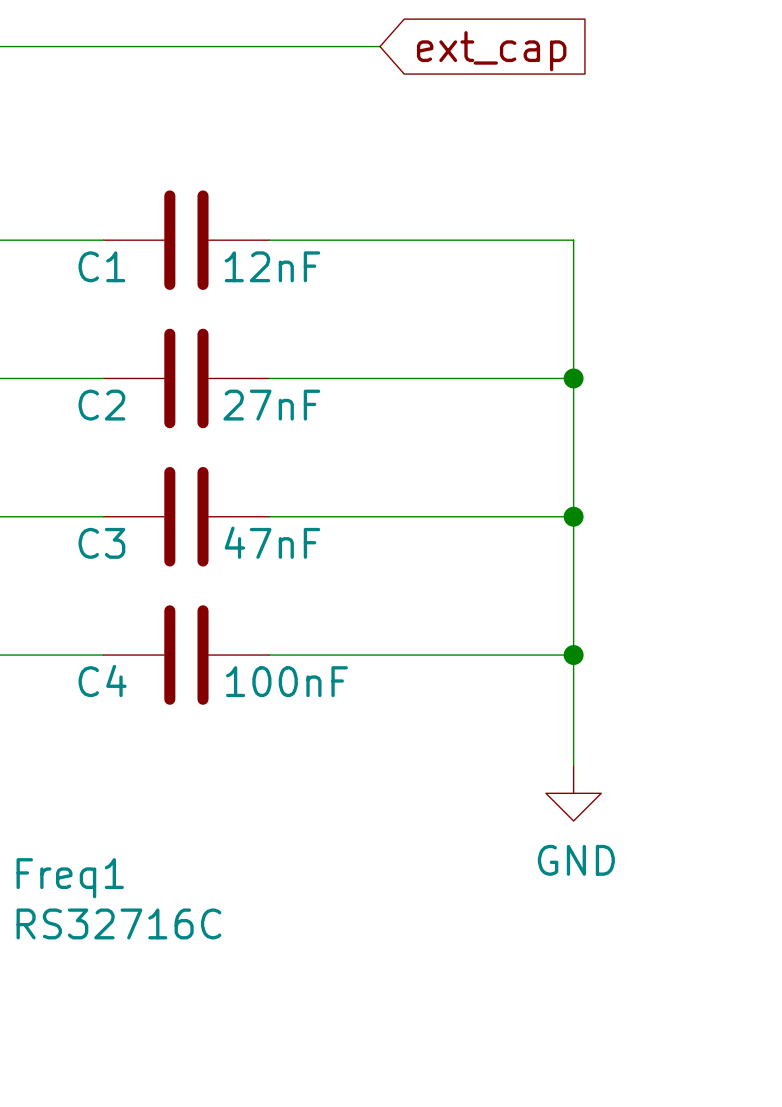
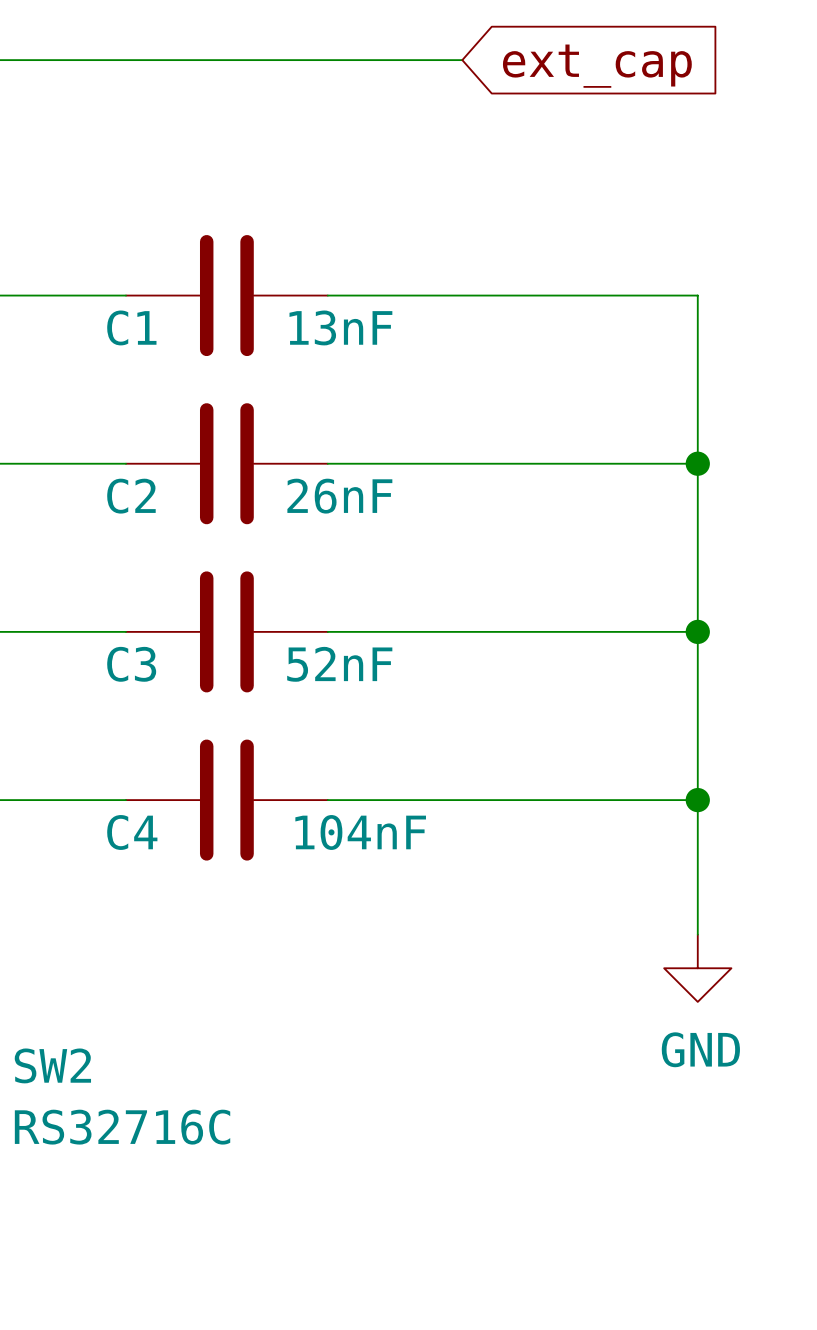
C1 value: 12nF (272, 266) -> 13nF (340, 327)
C2 value: 27nF (271, 405) -> 26nF (339, 496)
C3 value: 47nF (272, 542) -> 52nF (339, 664)
C4 value: 100nF (286, 681) -> 104nF (360, 832)
Freq1 name: Freq1 (70, 878) -> SW2 (52, 1065)

